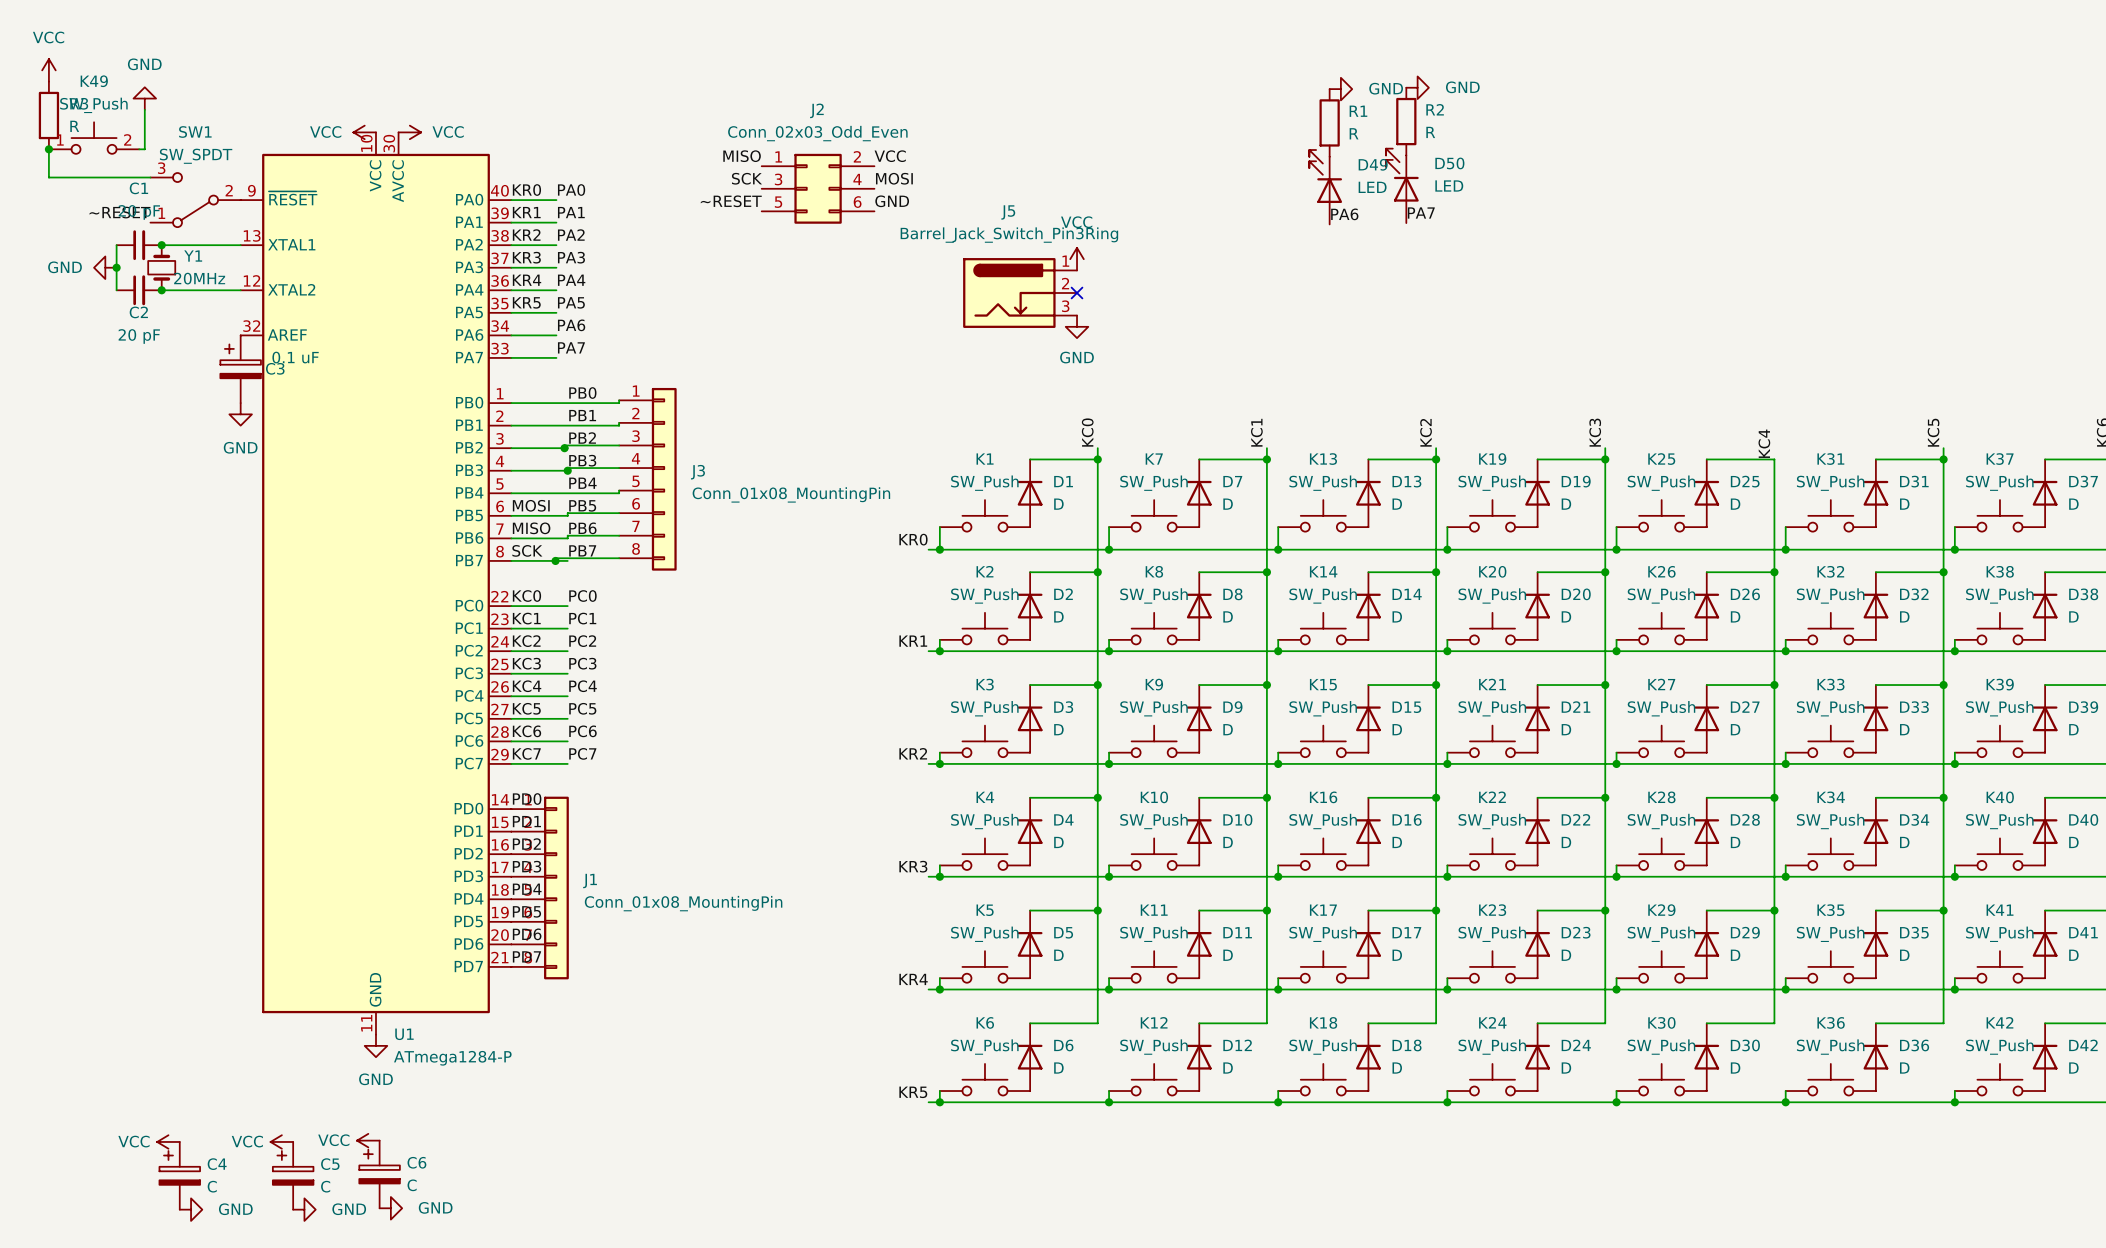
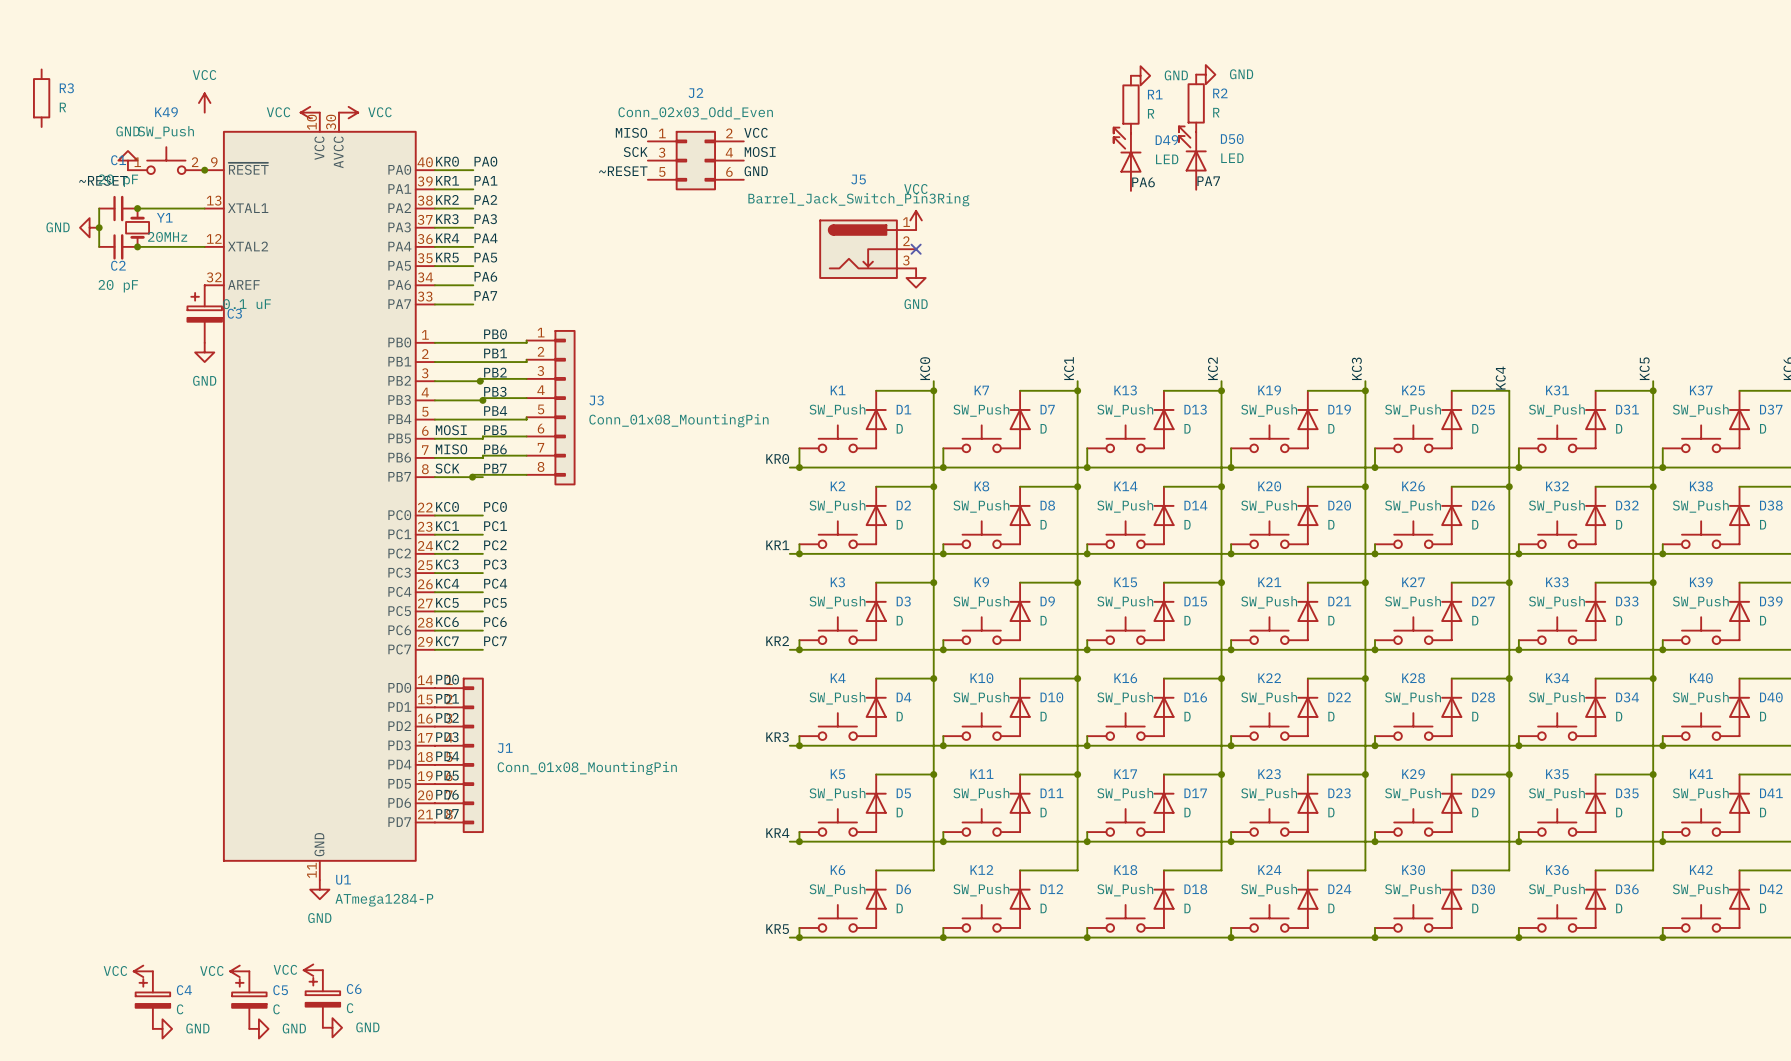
power symbol position: VCC (48, 70) -> VCC (204, 103)
power symbol position: GND (144, 98) -> GND (127, 160)
wire: (144, 109) (144, 149) (139, 149) -> none
K49 position: (94, 138) -> (166, 160)
wire: (48, 149) (48, 177) (150, 177) -> none
junction: (48, 149) -> none
SW1: SW_SPDT (195, 200) -> none
junction: none -> (204, 170)

